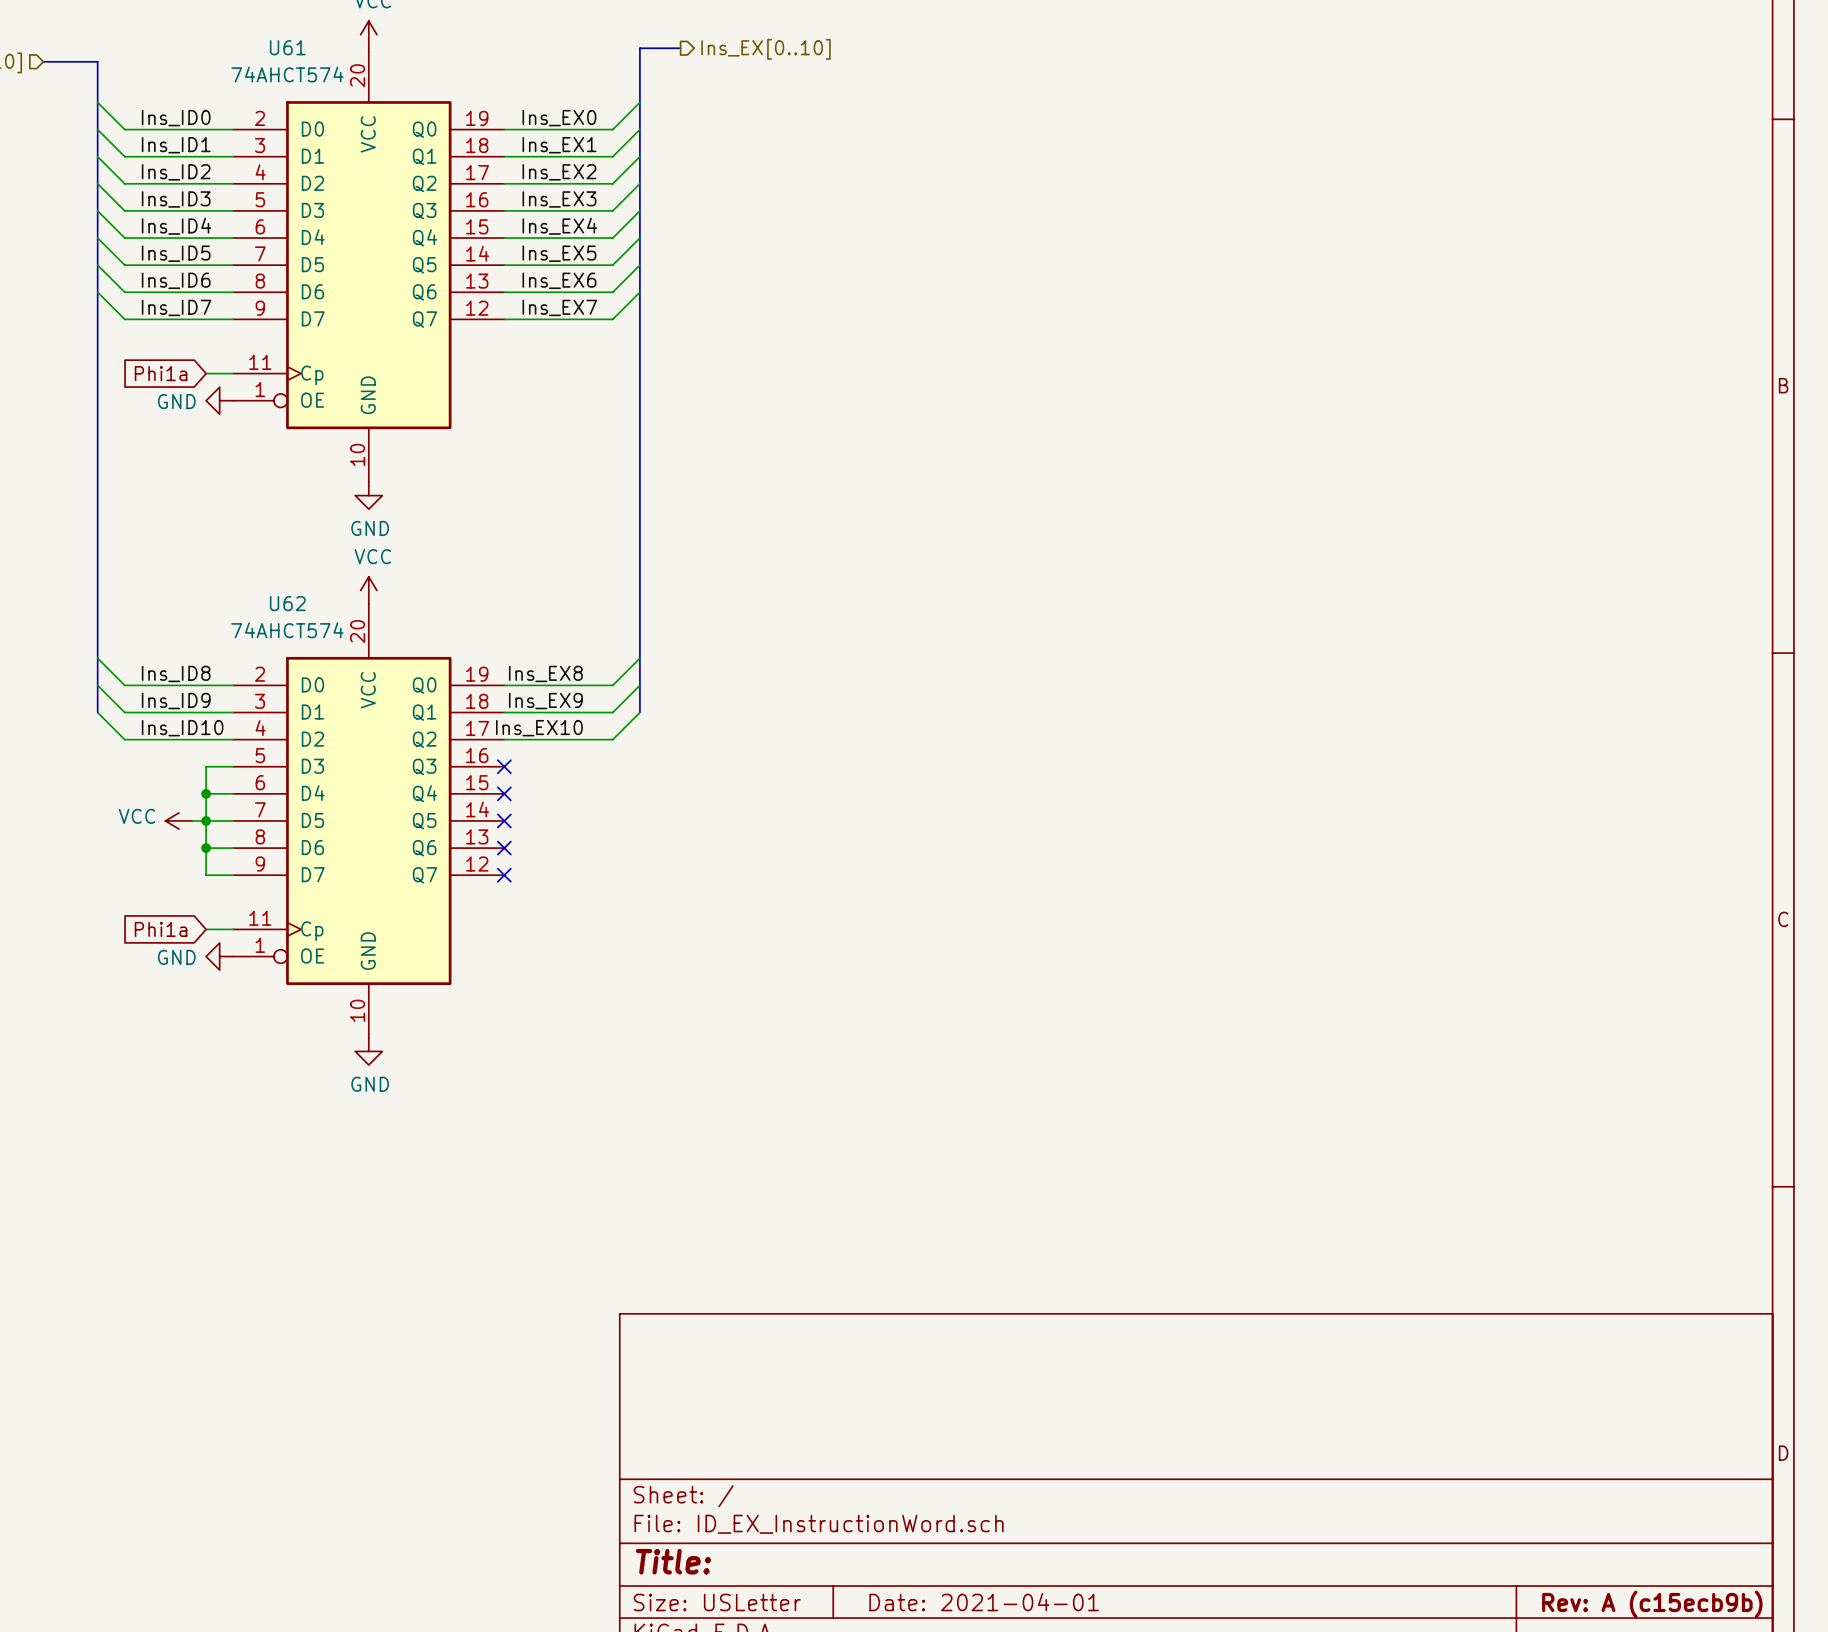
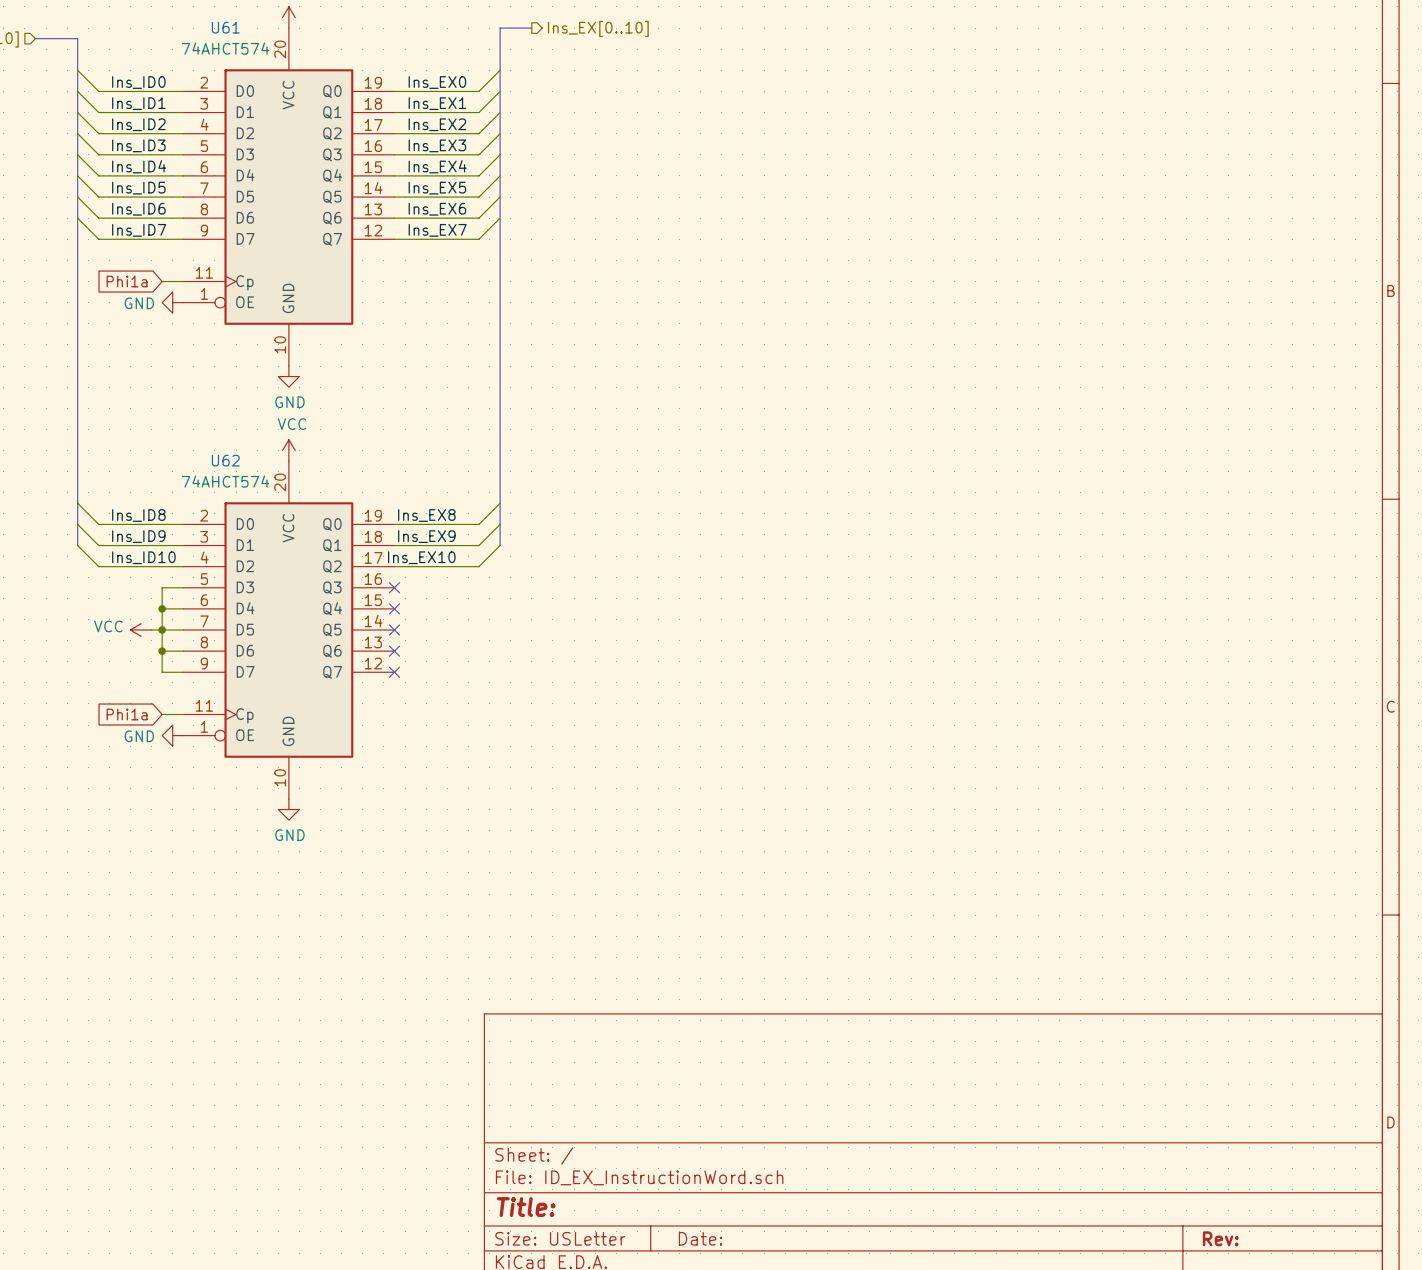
title block: Date: 2021-04-01 (984, 1602) -> Date: (700, 1238)
title block: Rev: A (c15ecb9b) (1652, 1604) -> Rev: (1220, 1238)

